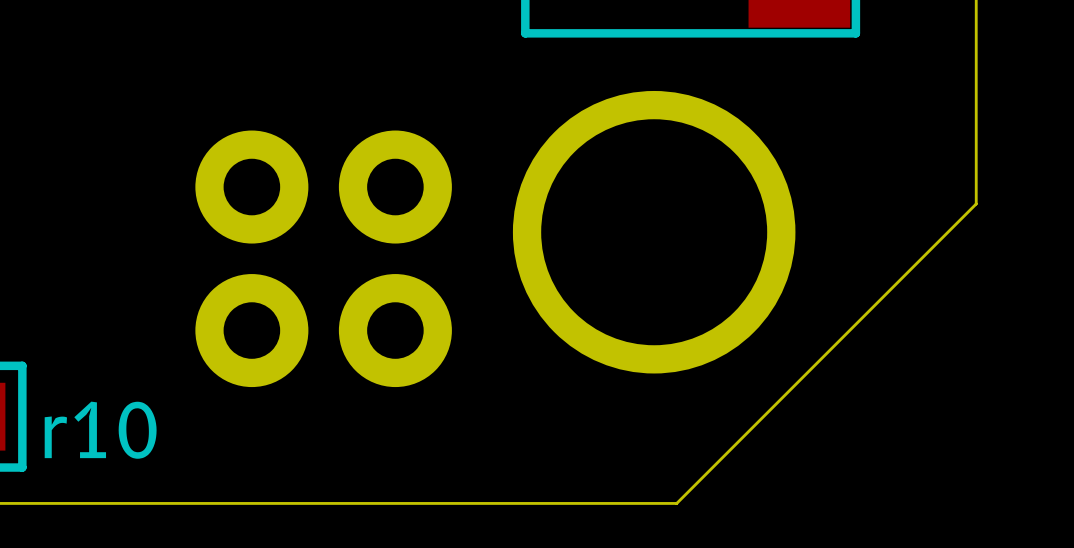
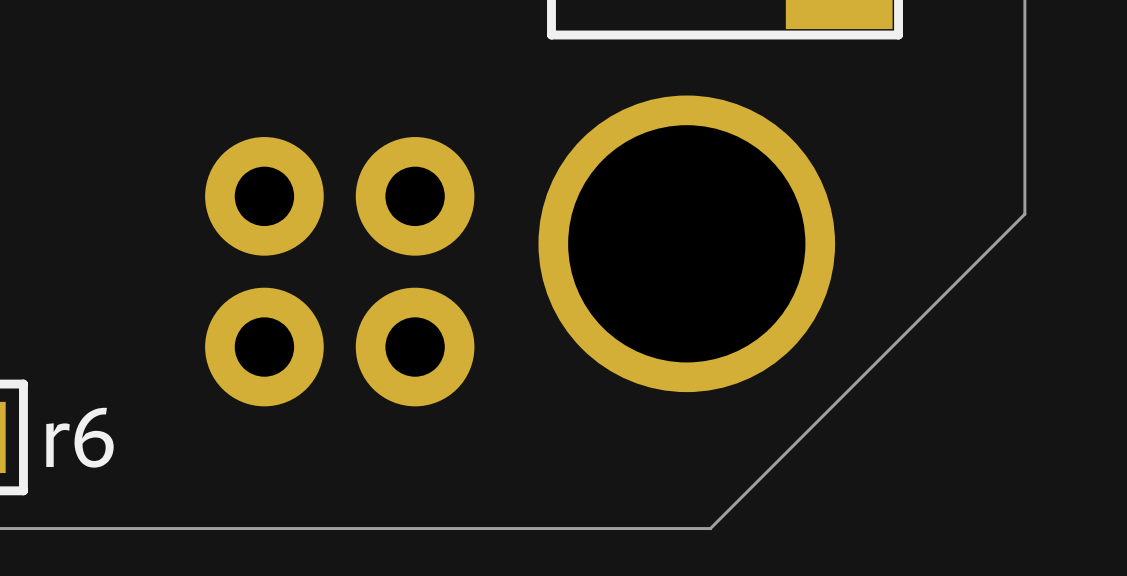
r10 name: r10 (100, 430) -> r6 (79, 437)

